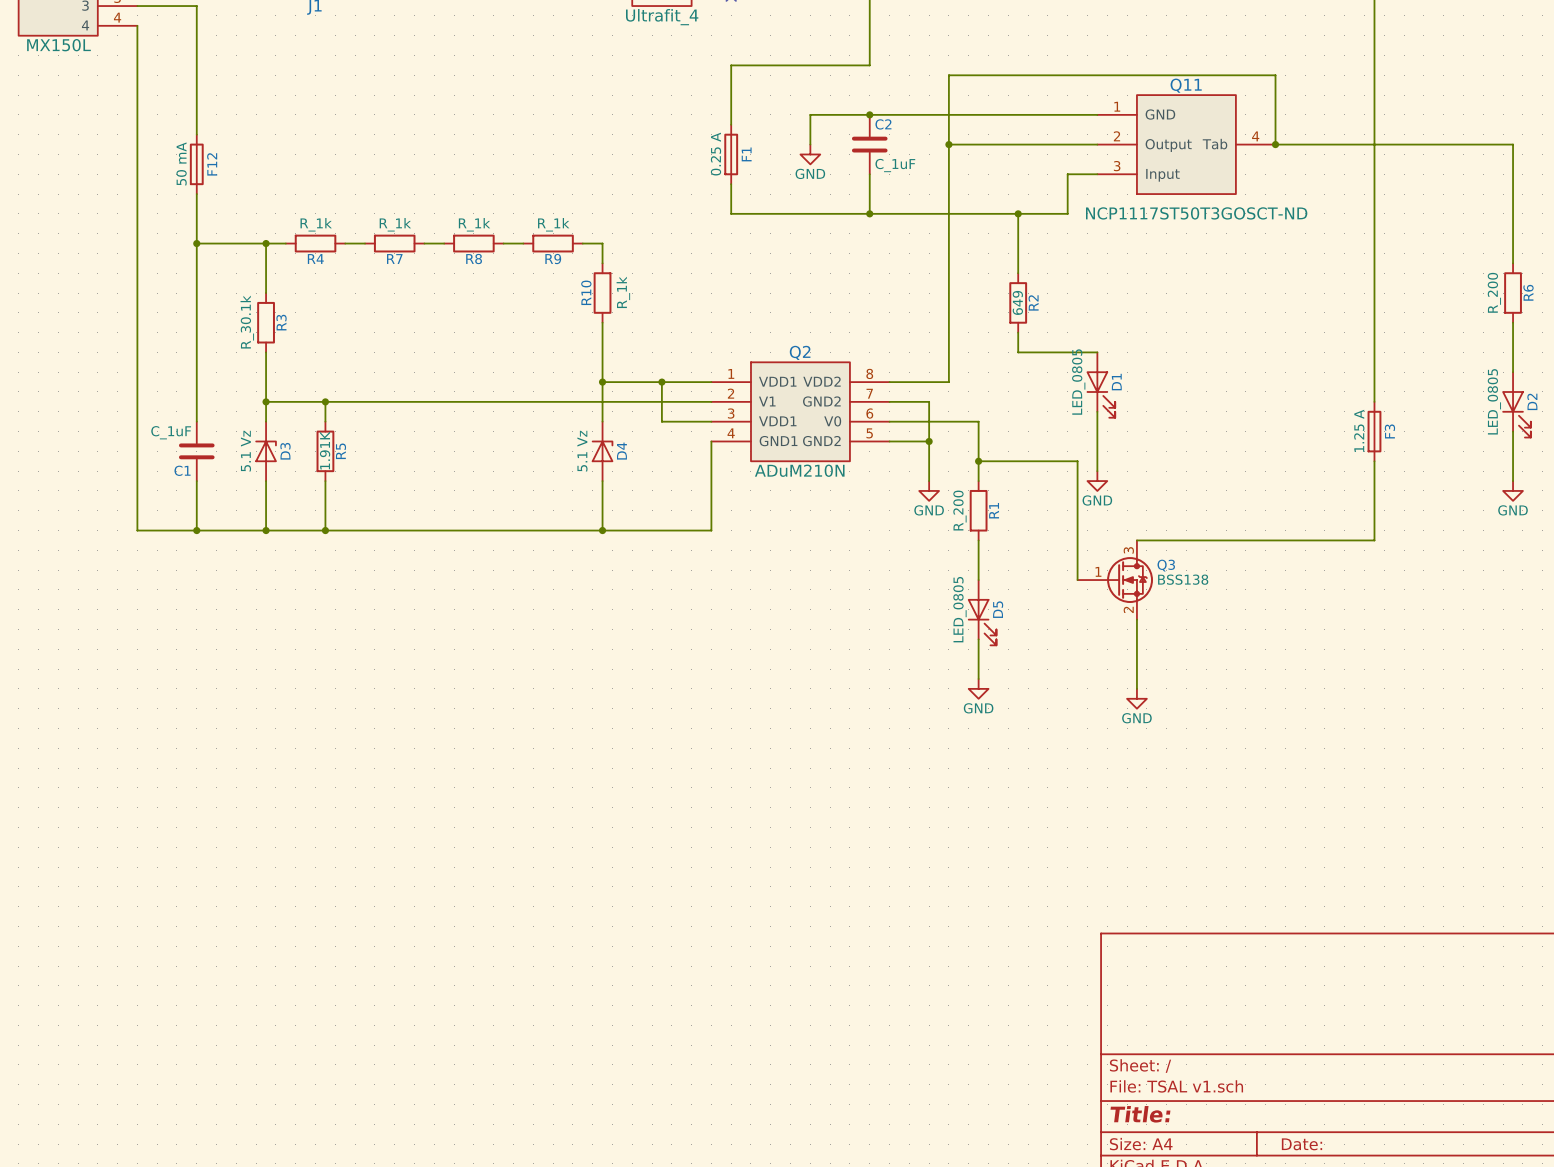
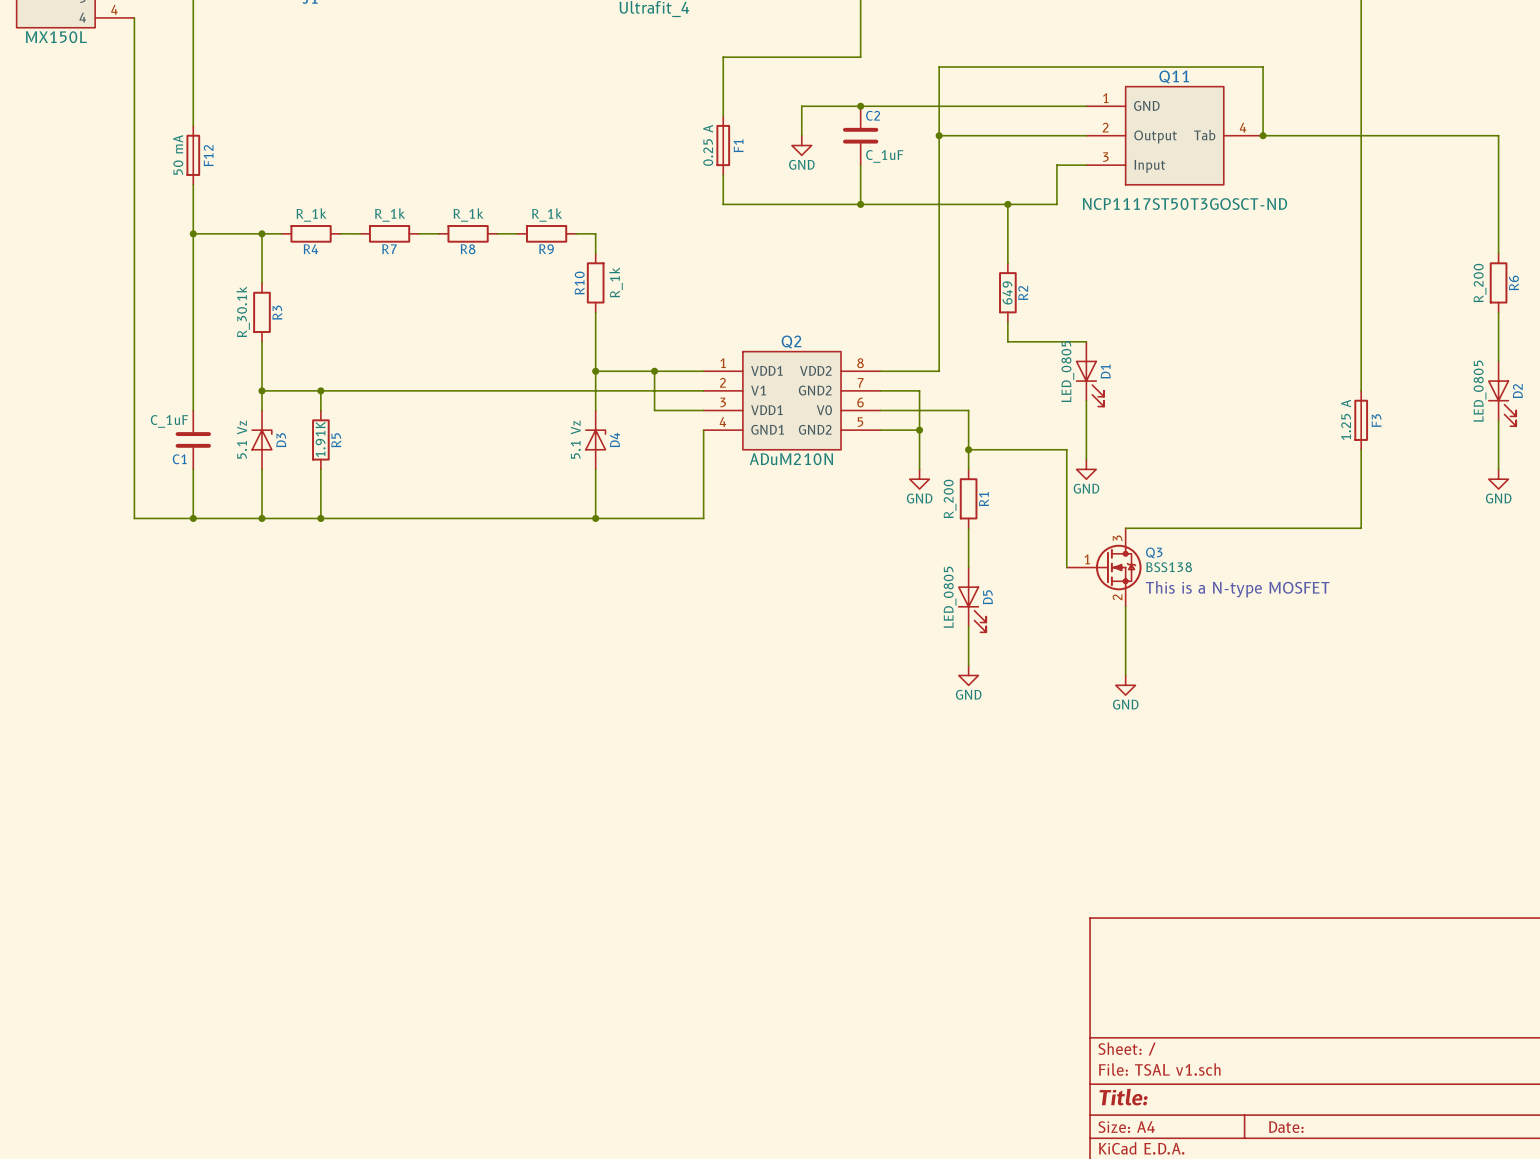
text: none -> This is a N-type MOSFET (1237, 589)

